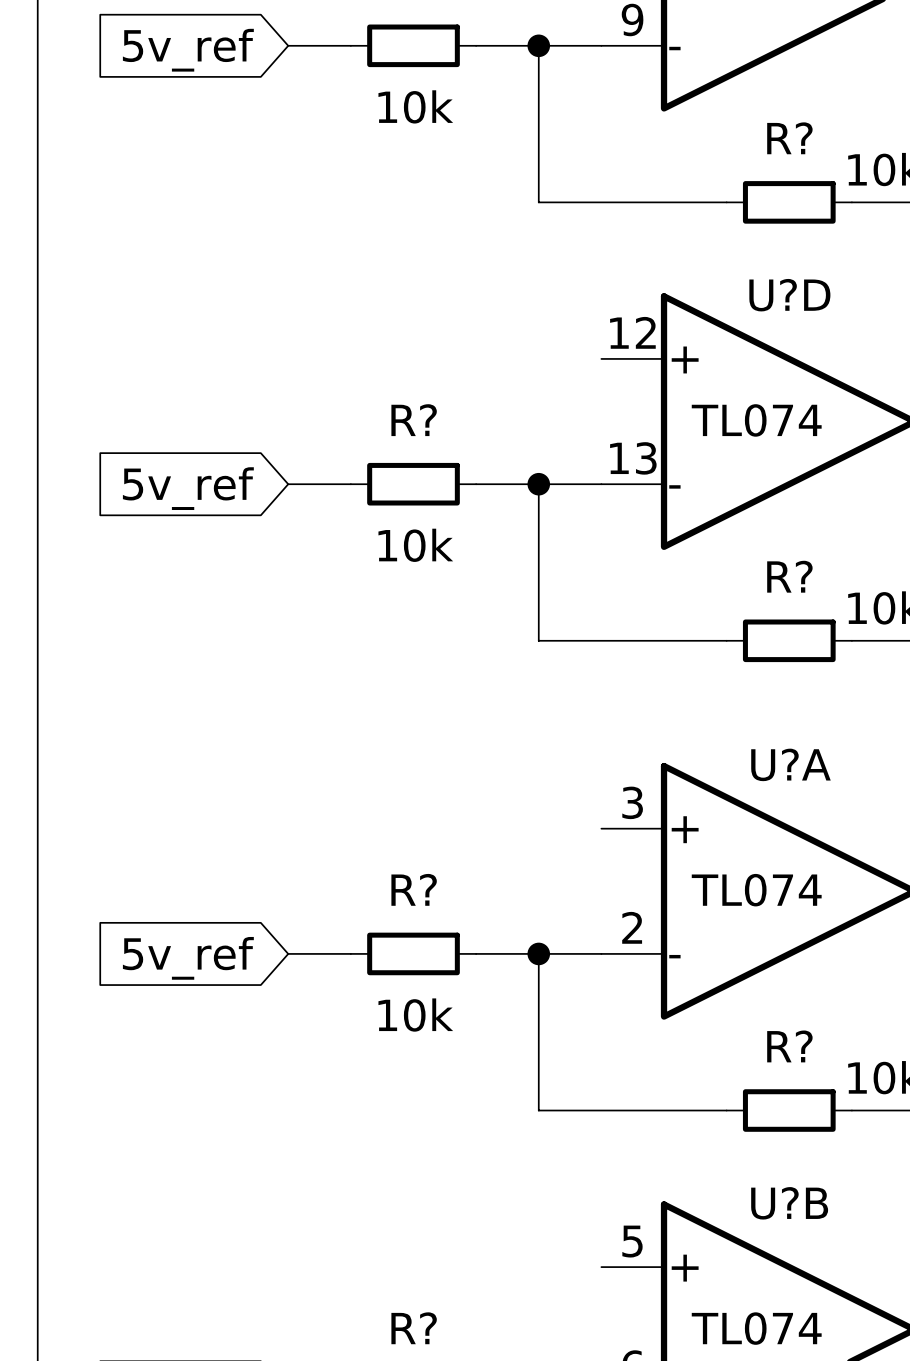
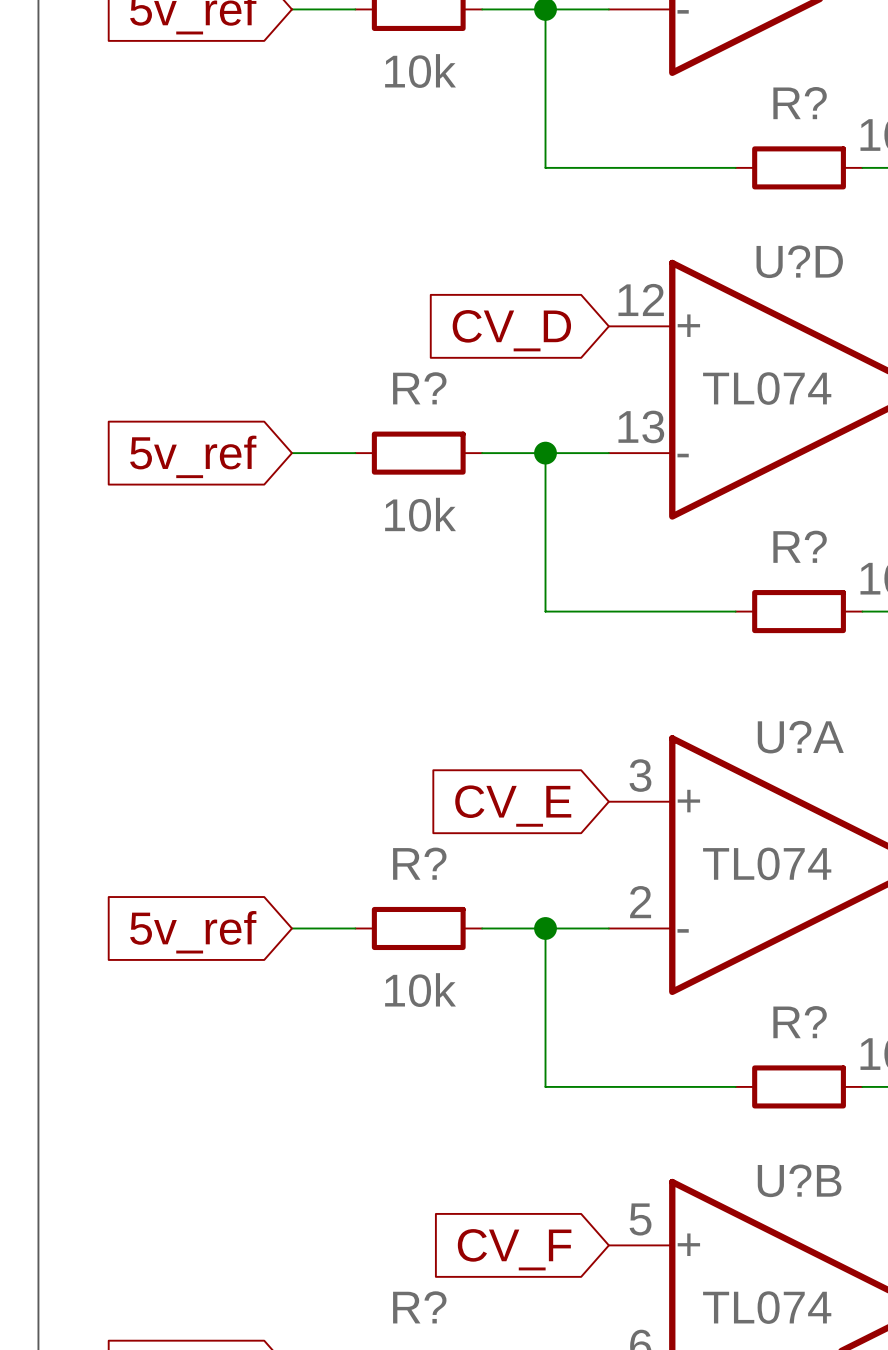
global label: none -> CV_D (511, 330)
global label: none -> CV_E (513, 806)
global label: none -> CV_F (514, 1249)

